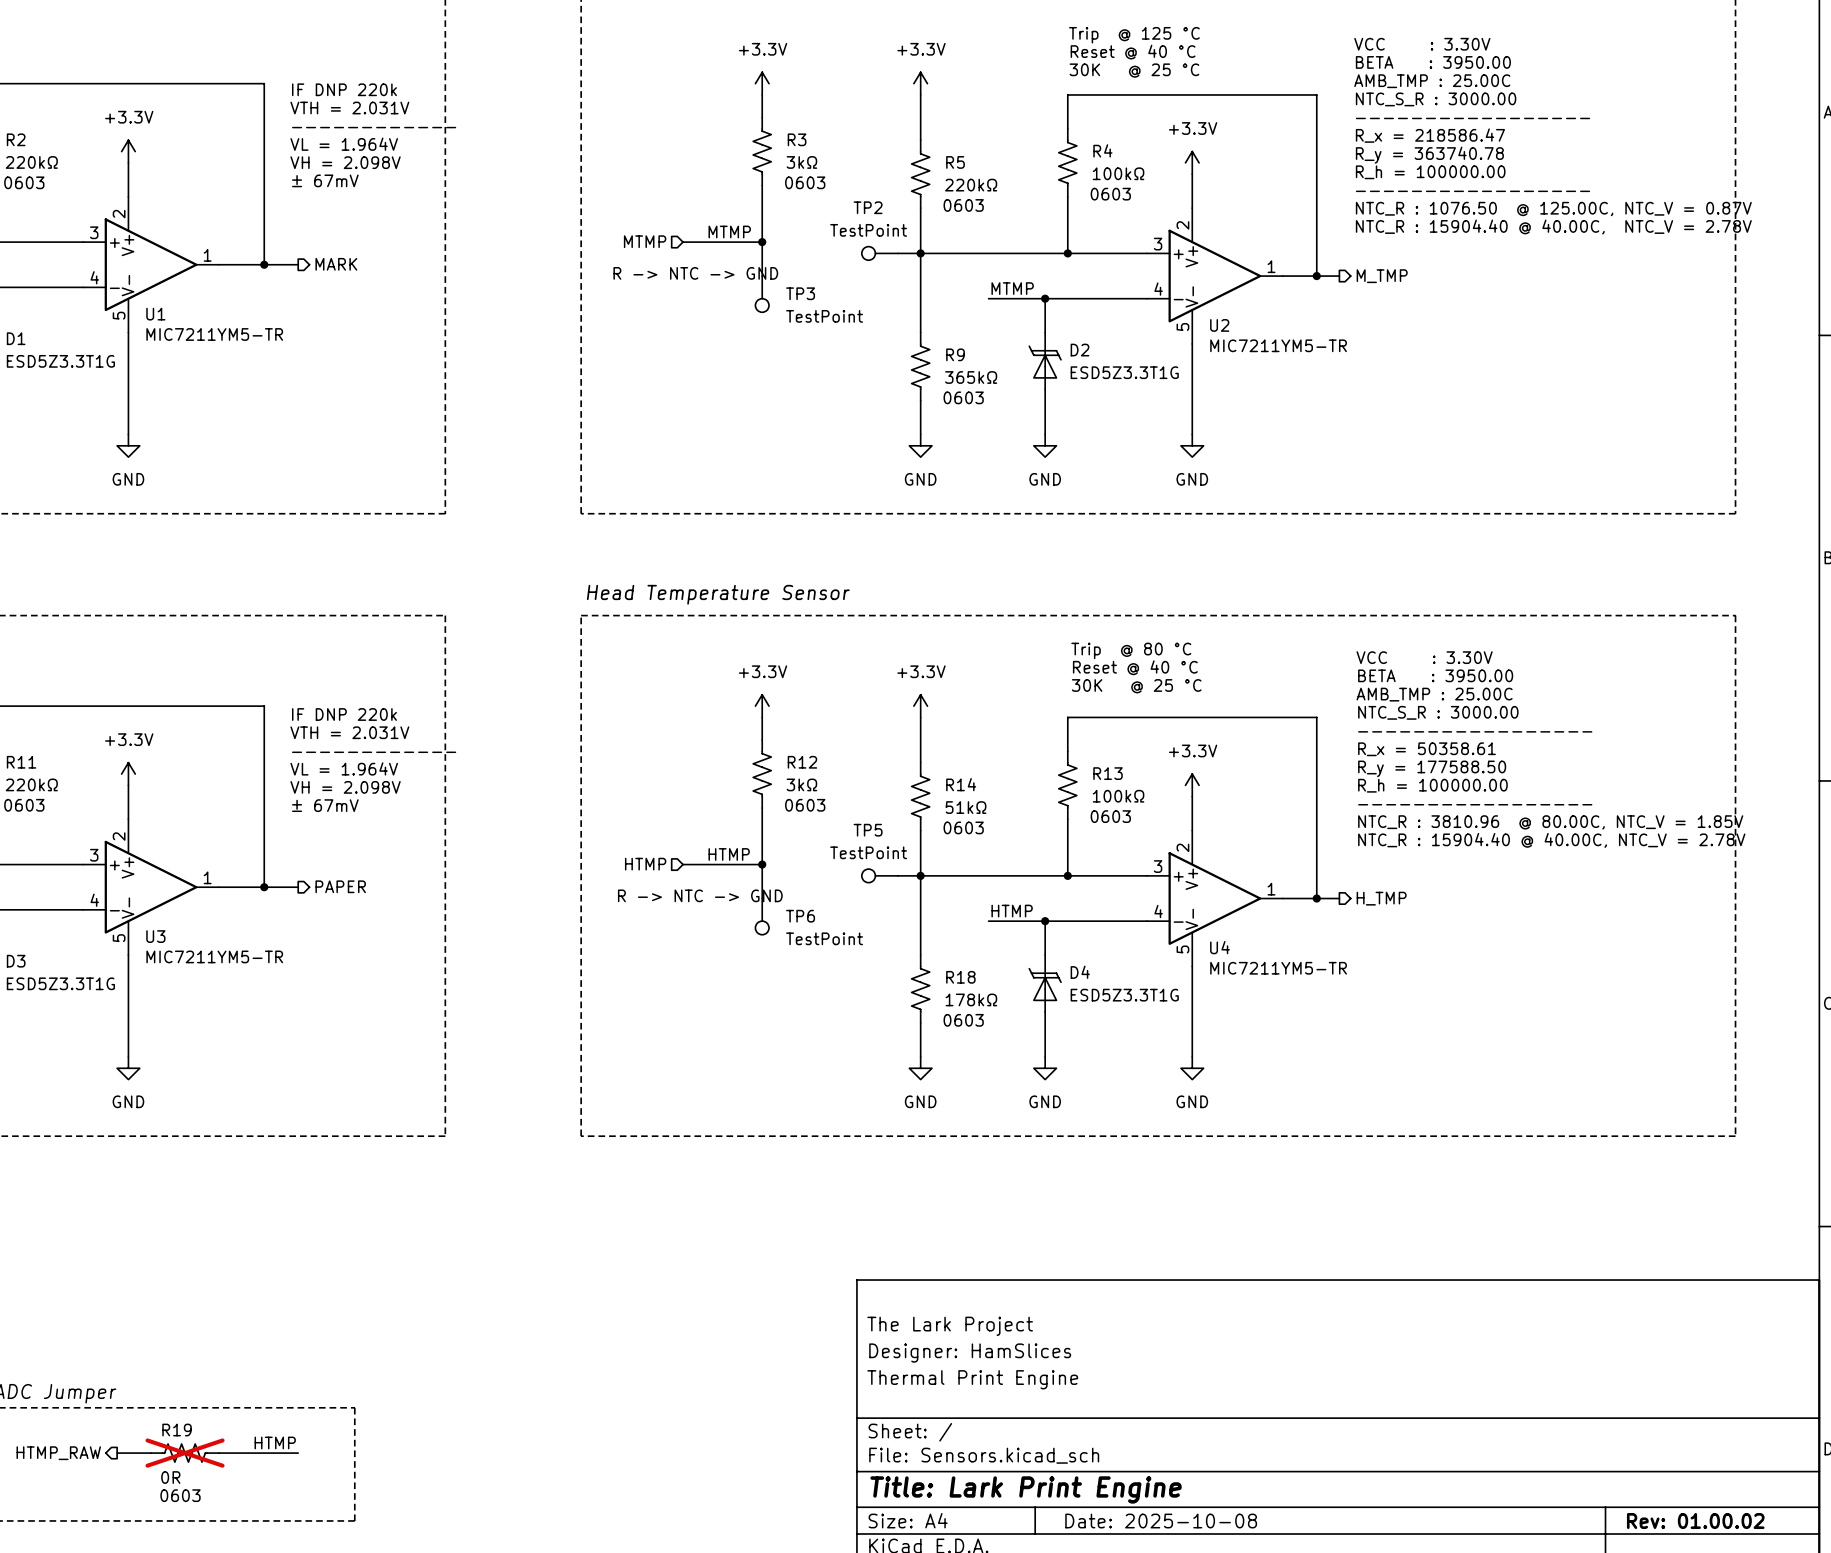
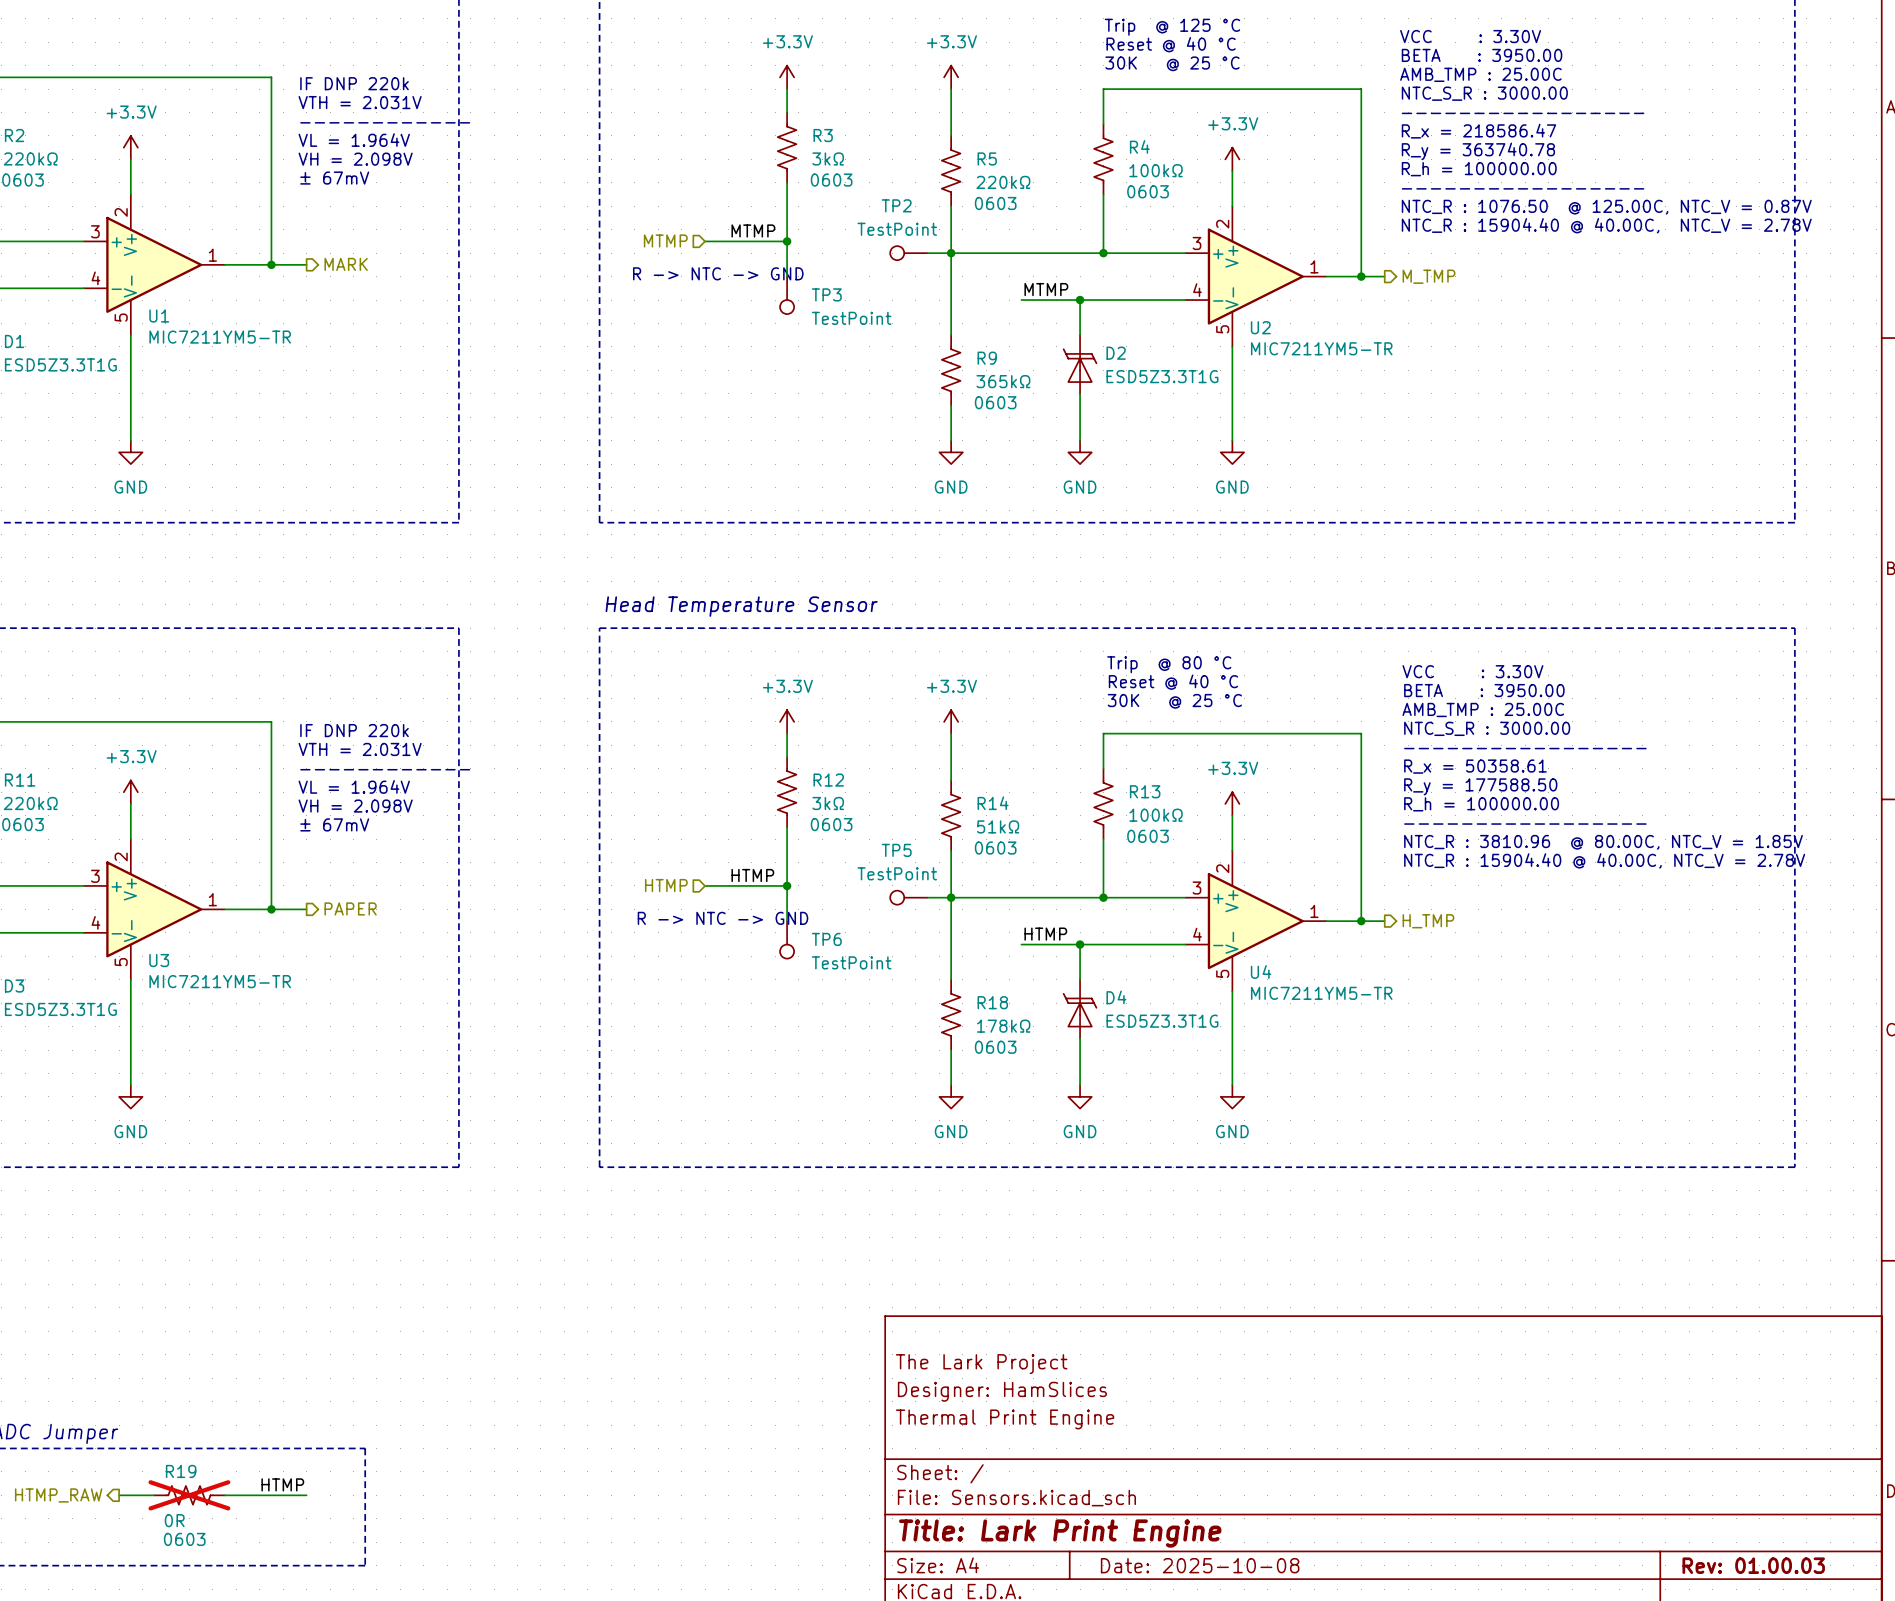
title block: Rev: 01.00.02 (1695, 1521) -> Rev: 01.00.03 (1753, 1565)

